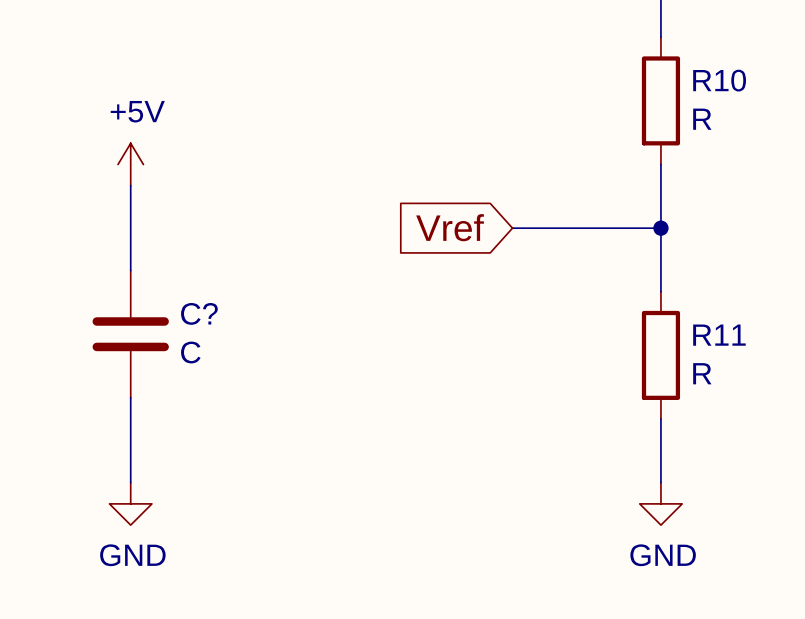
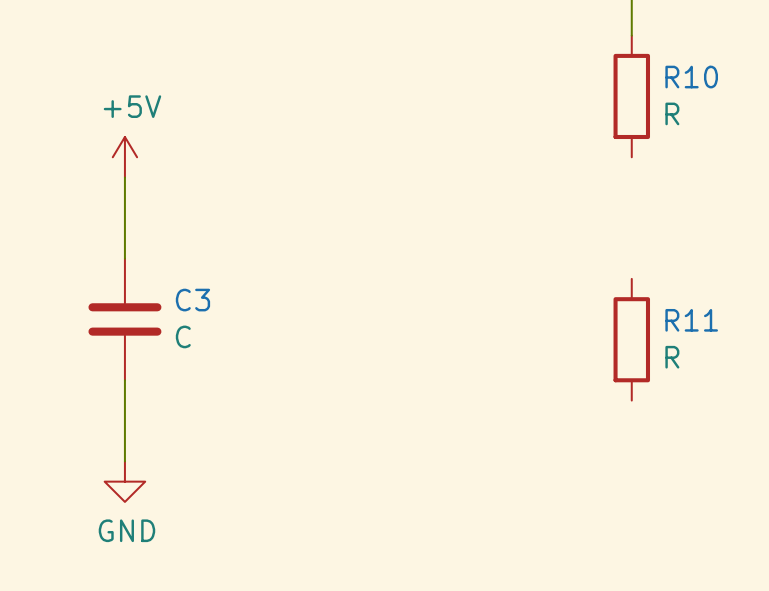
wire: (660, 164) (660, 291) -> none
global label: Vref (450, 227) -> none
wire: (512, 228) (660, 228) -> none
junction: (660, 228) -> none
C? name: C? (199, 313) -> C3 (192, 300)
wire: (660, 419) (660, 482) -> none
power symbol: GND (660, 503) -> none

